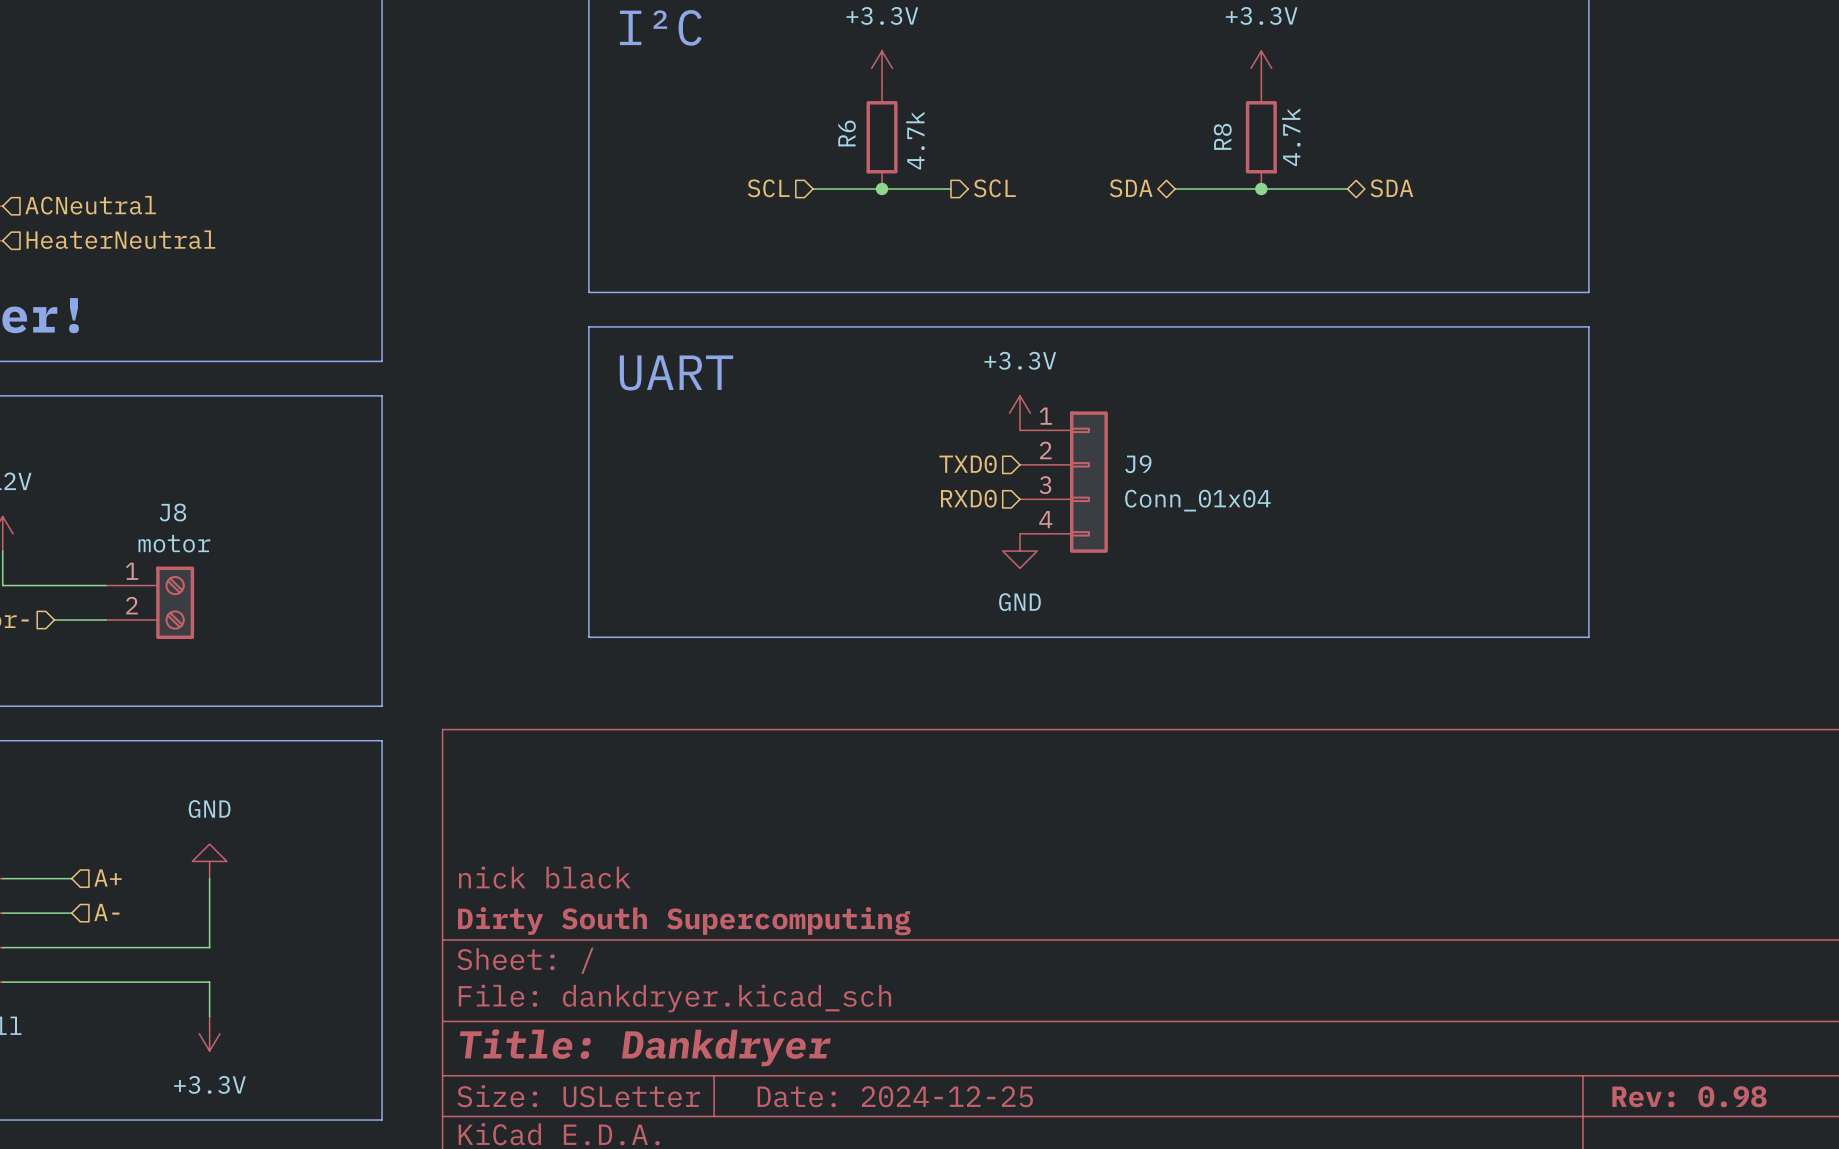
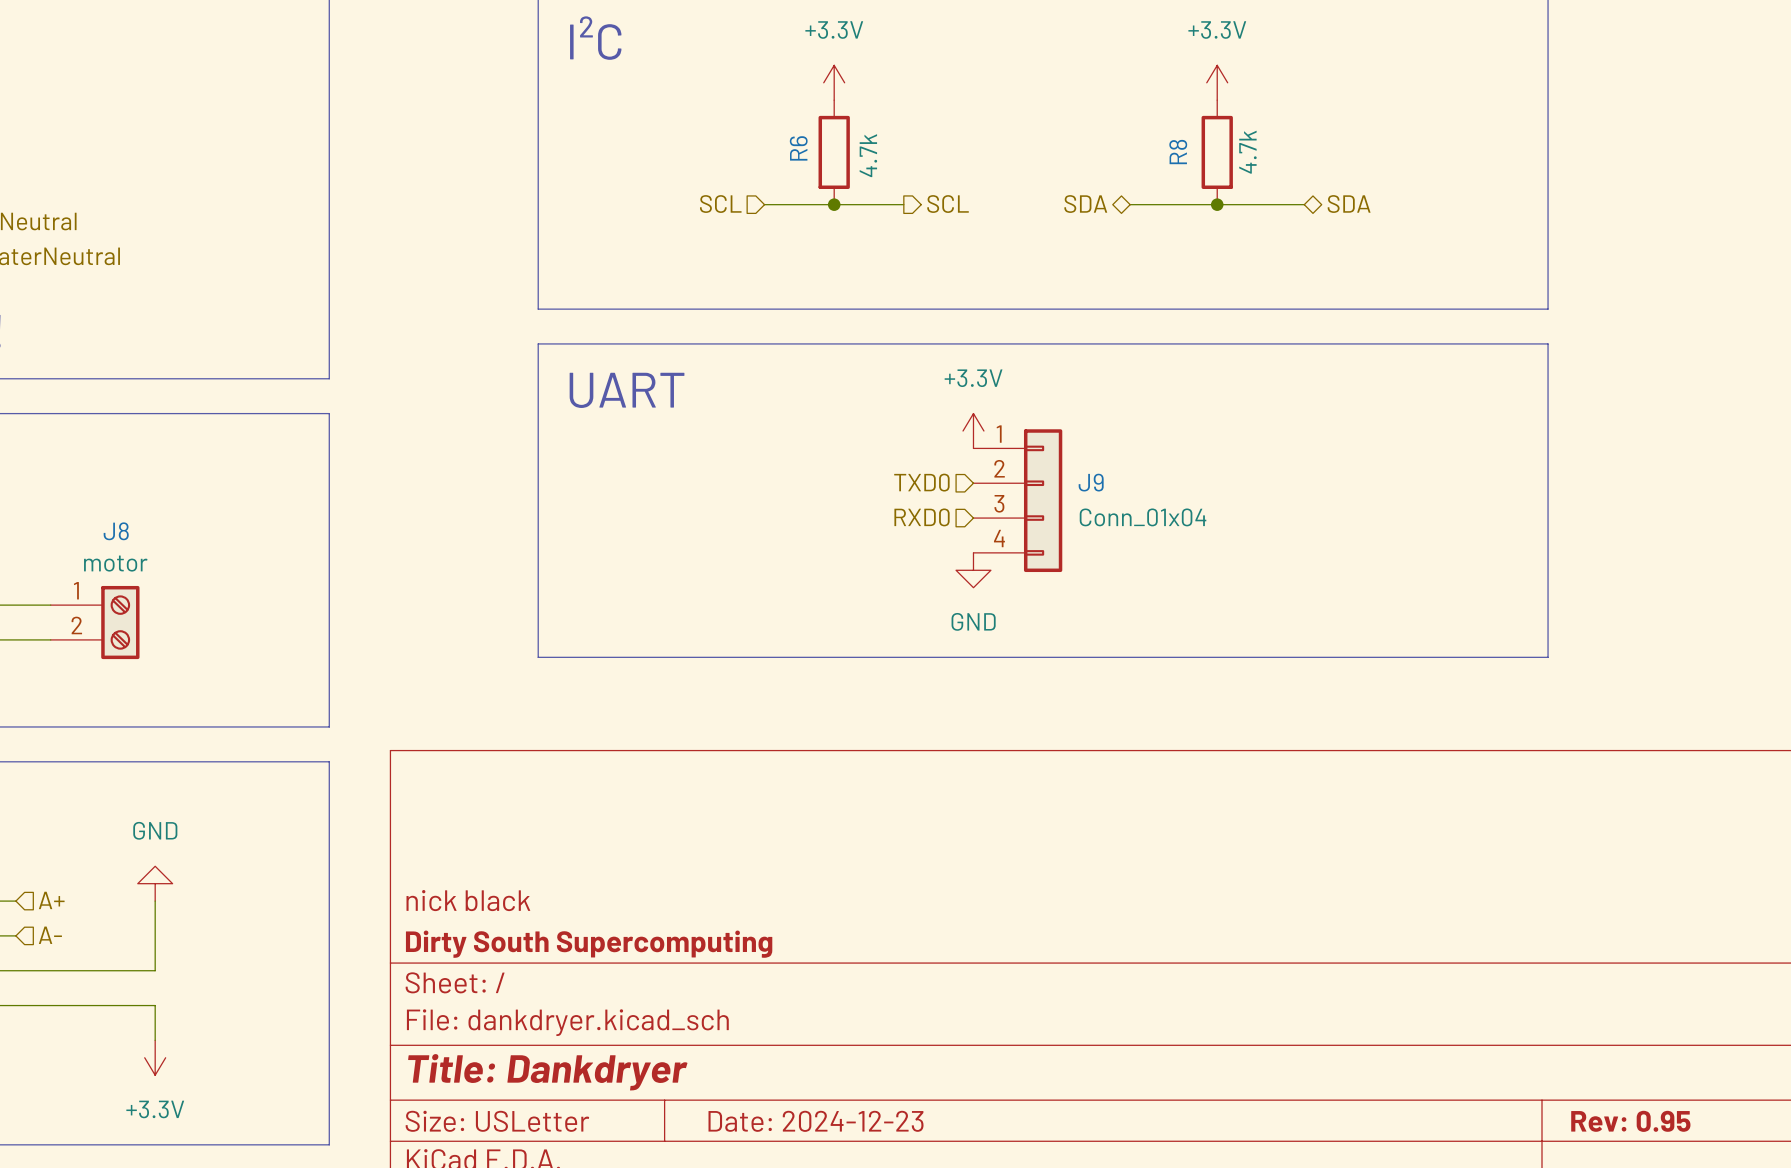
title block: Date: 2024-12-25 (895, 1096) -> Date: 2024-12-23 (816, 1121)
title block: Rev: 0.98 (1689, 1096) -> Rev: 0.95 (1630, 1121)

